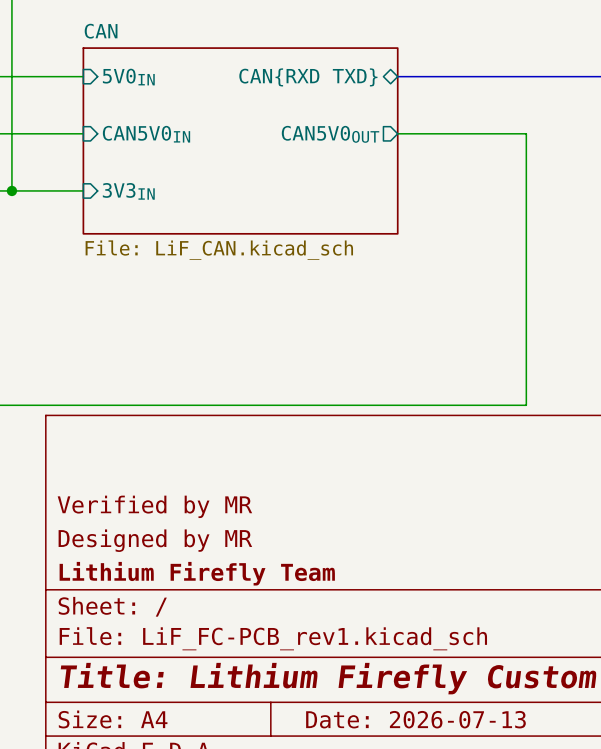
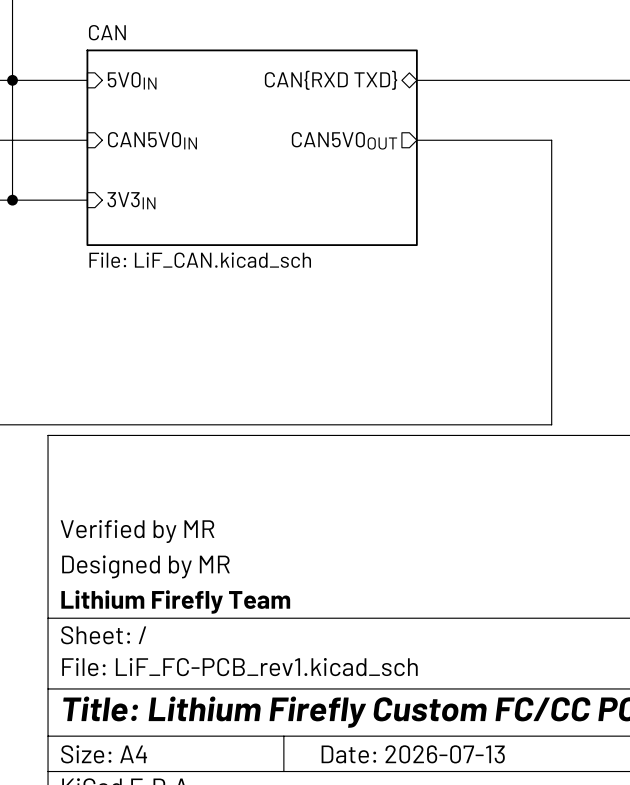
junction: none -> (12, 80)

